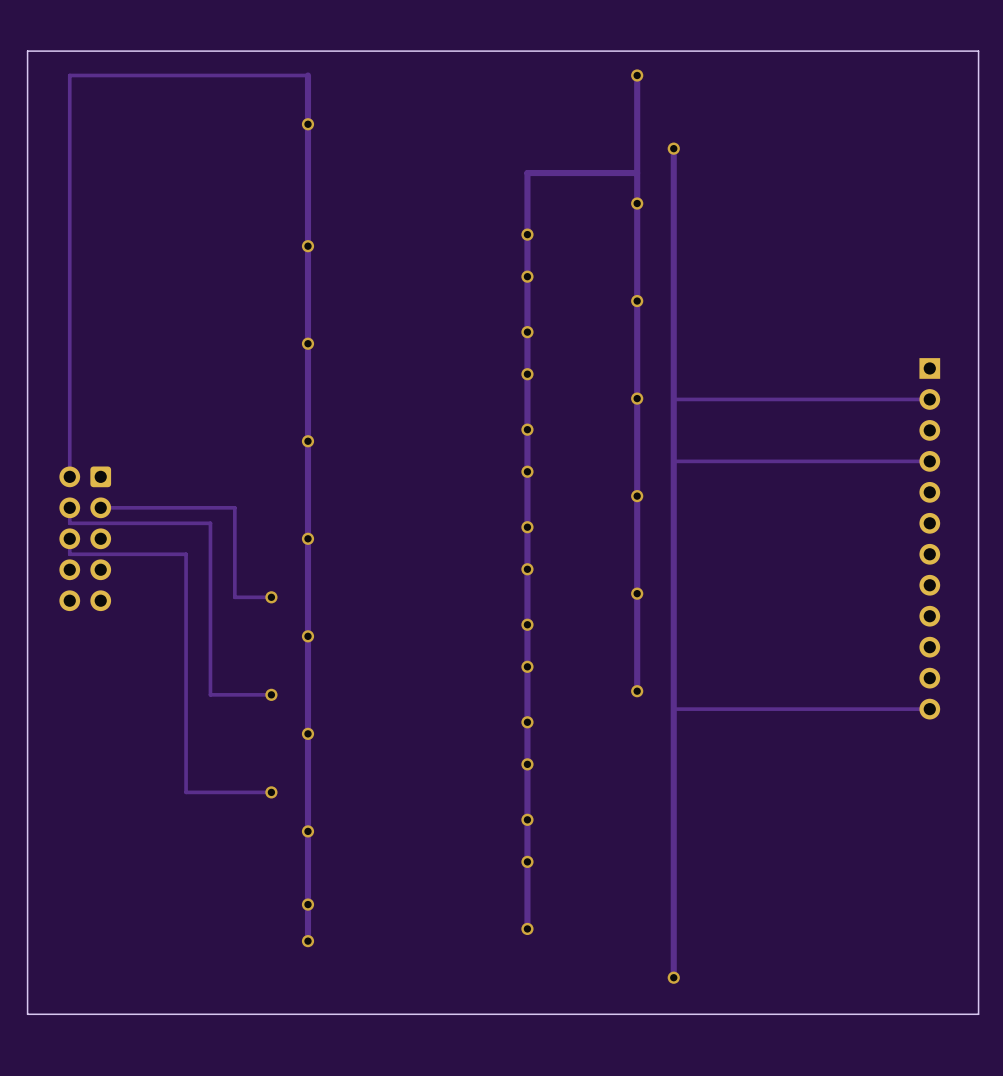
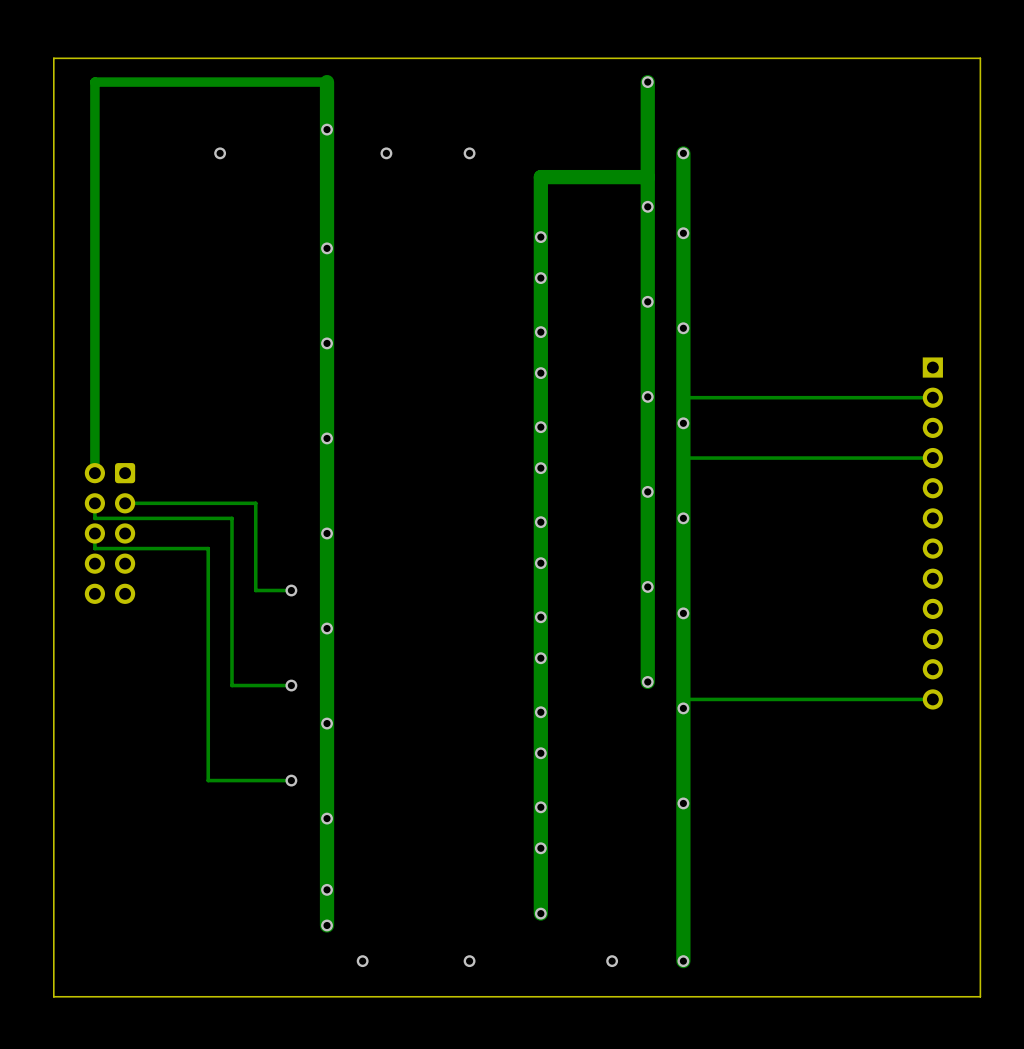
track width: thin (637, 75) (637, 691) -> thick (647, 82) (647, 681)
via: none -> (220, 153)
via: none -> (386, 153)
via: none -> (469, 153)
track width: thin (673, 148) (673, 977) -> thick (683, 153) (683, 961)
track width: thin (637, 173) (527, 173) (527, 928) -> thick (647, 177) (540, 177) (540, 913)
via: none -> (683, 233)
via: none -> (683, 328)
via: none -> (683, 423)
track width: thin (69, 476) (69, 75) (307, 75) (307, 941) -> thick (94, 473) (94, 82) (327, 82) (327, 925)
via: none -> (683, 518)
via: none -> (683, 613)
via: none -> (683, 708)
via: none -> (683, 803)
via: none -> (362, 961)
via: none -> (469, 961)
via: none -> (612, 961)

